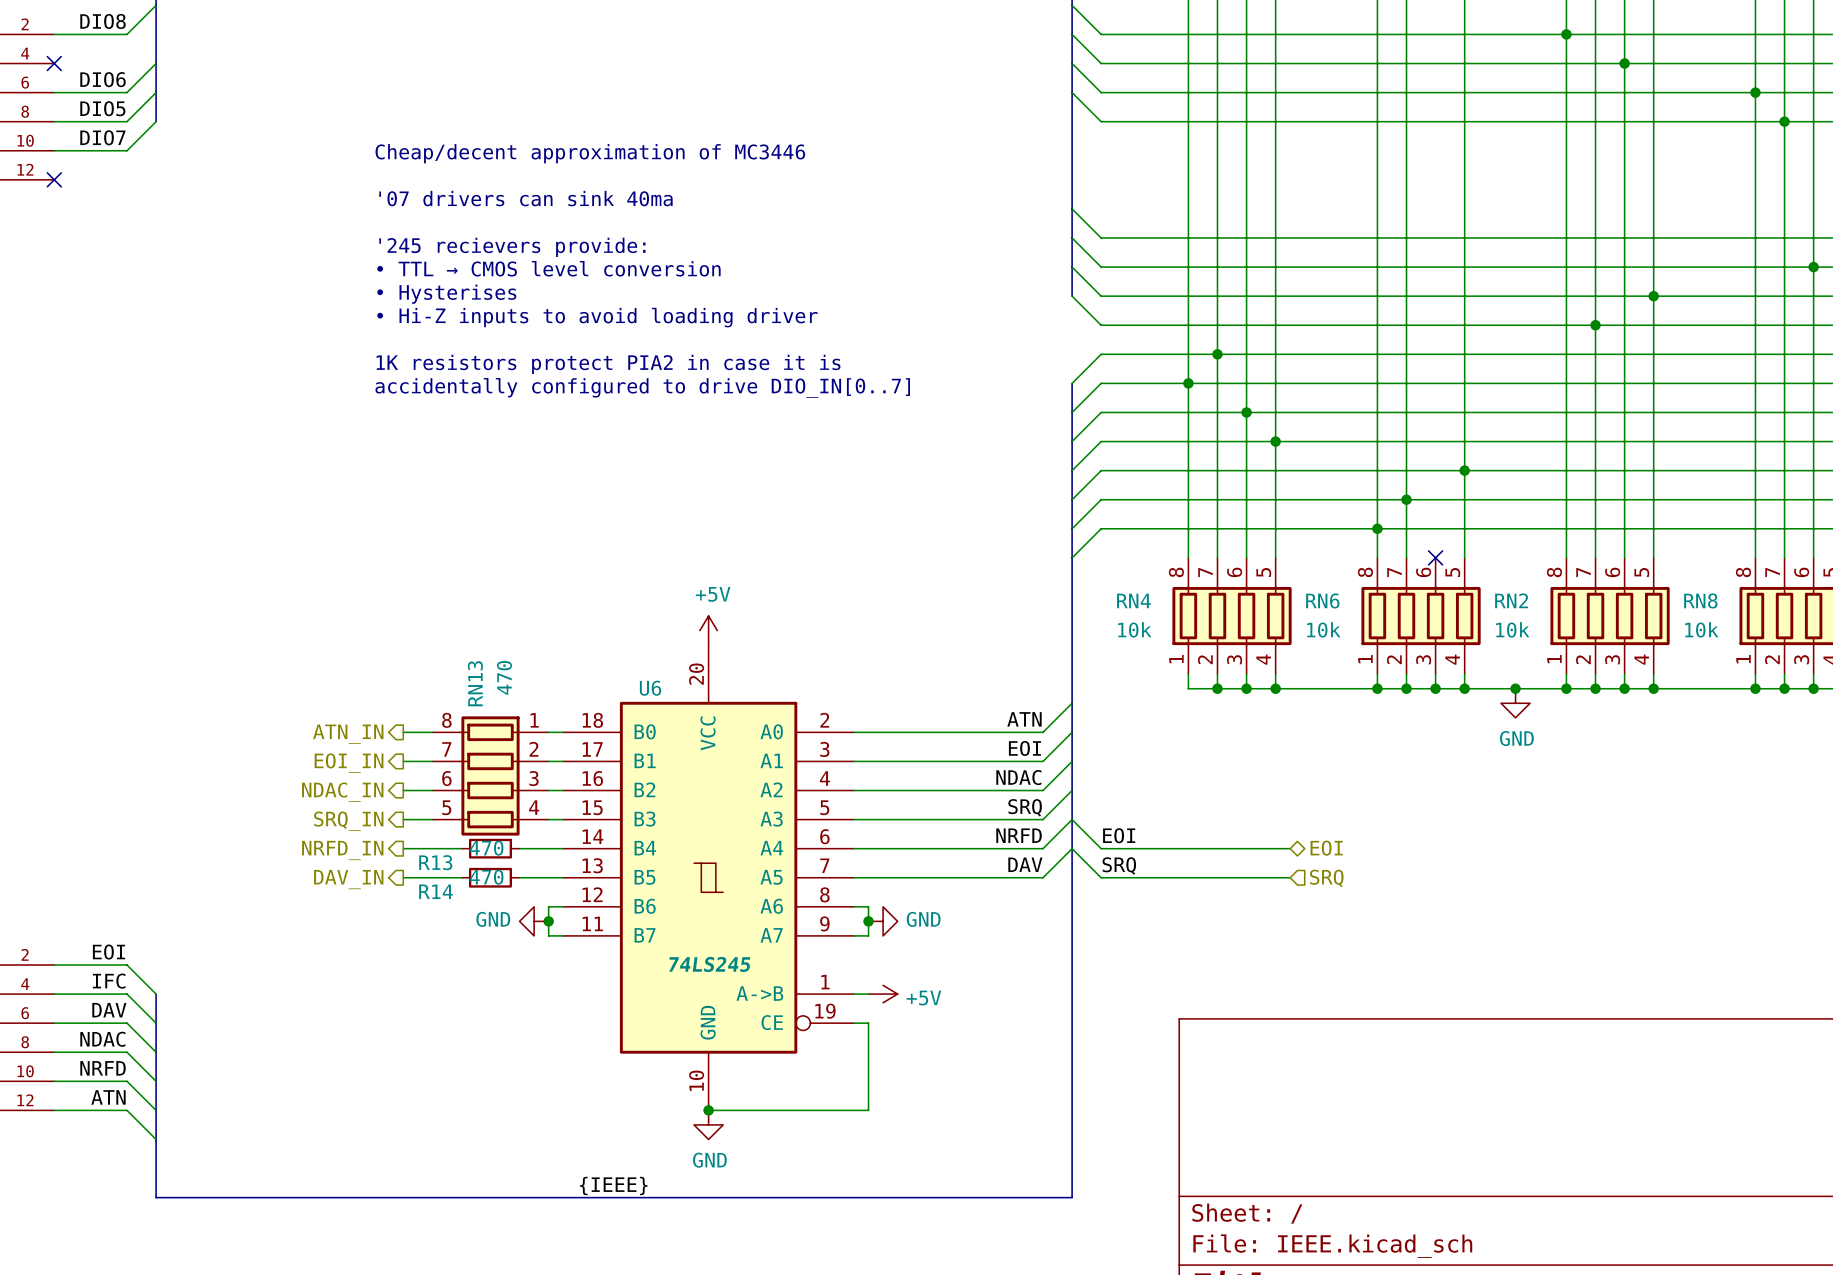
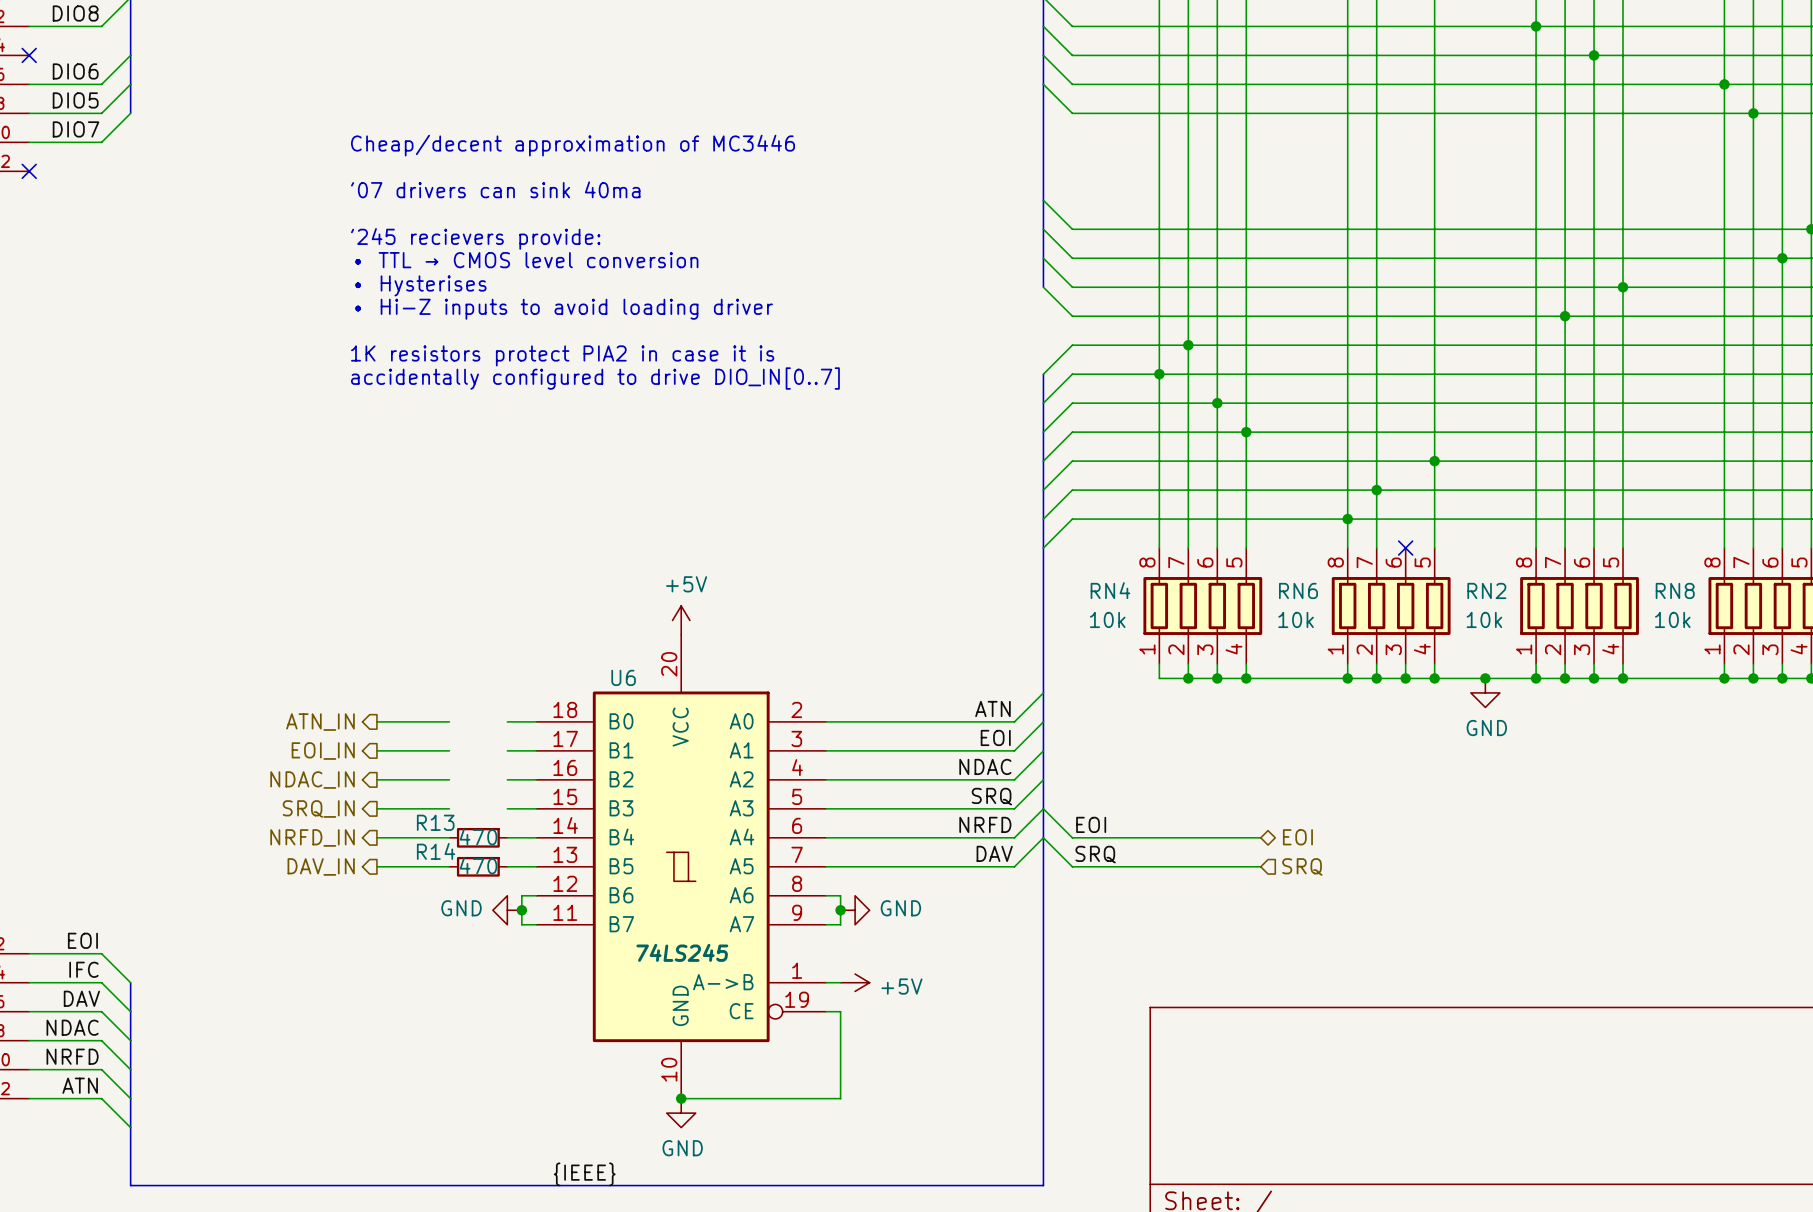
RN13: 470 (490, 775) -> none
R13 position: (490, 848) -> (478, 837)
R13 name position: R13 (435, 862) -> R13 (435, 822)
R14 position: (490, 877) -> (478, 866)
R14 name position: R14 (436, 891) -> R14 (436, 851)

